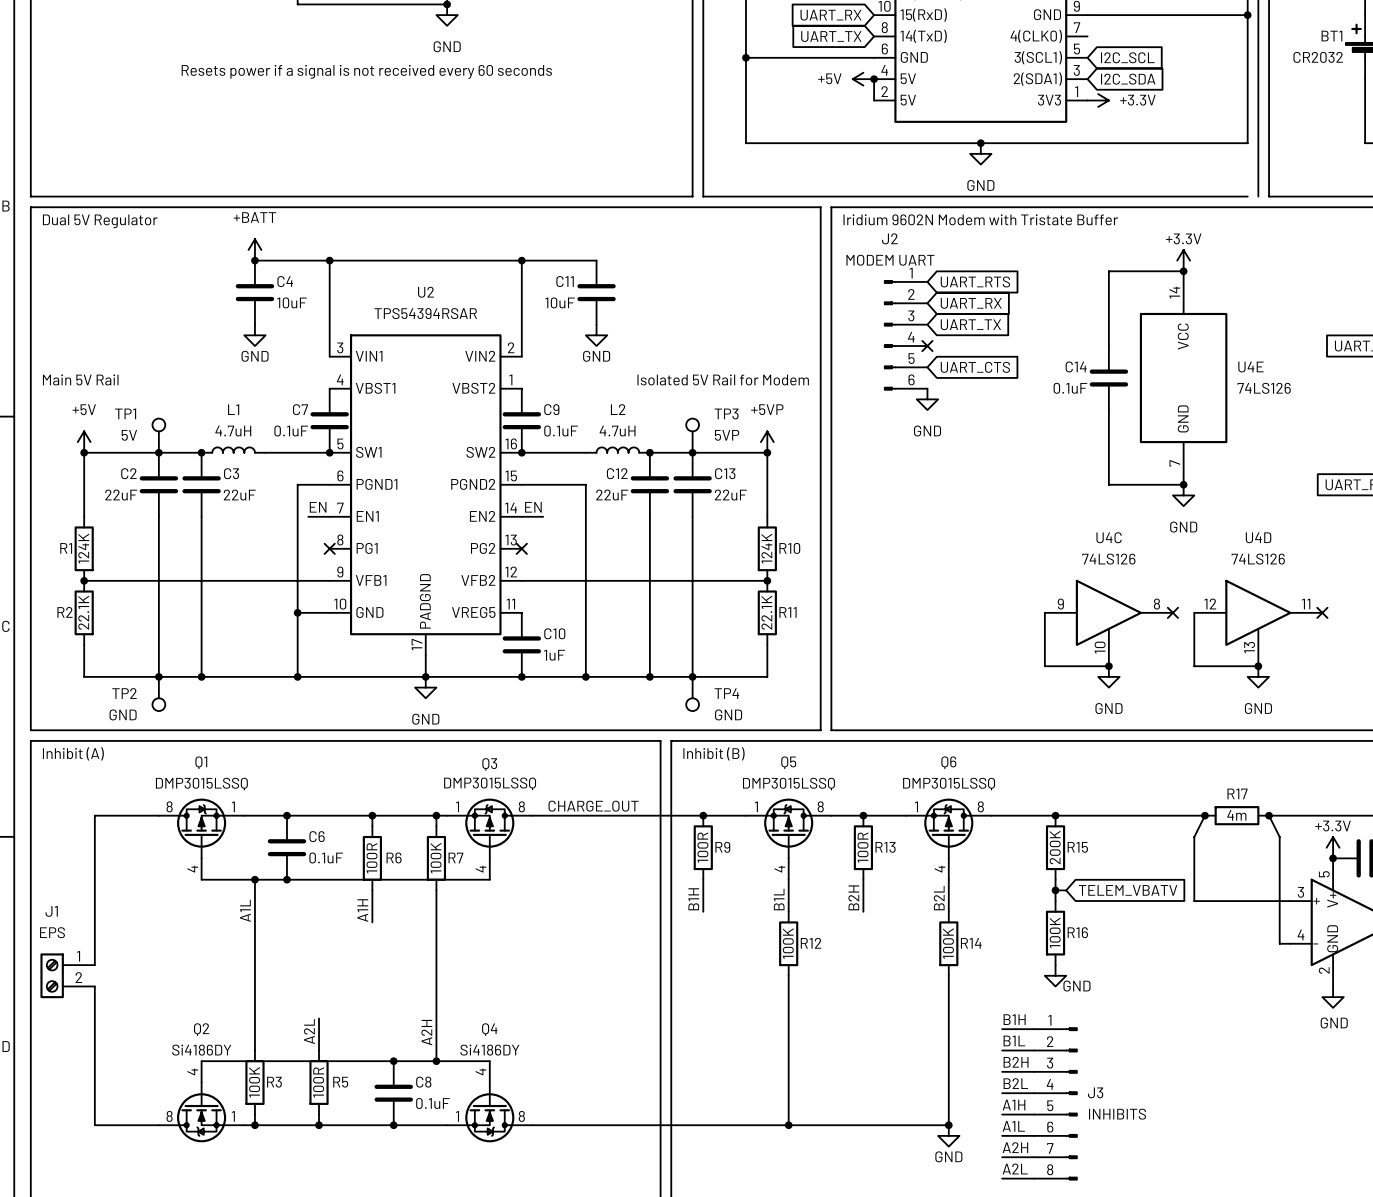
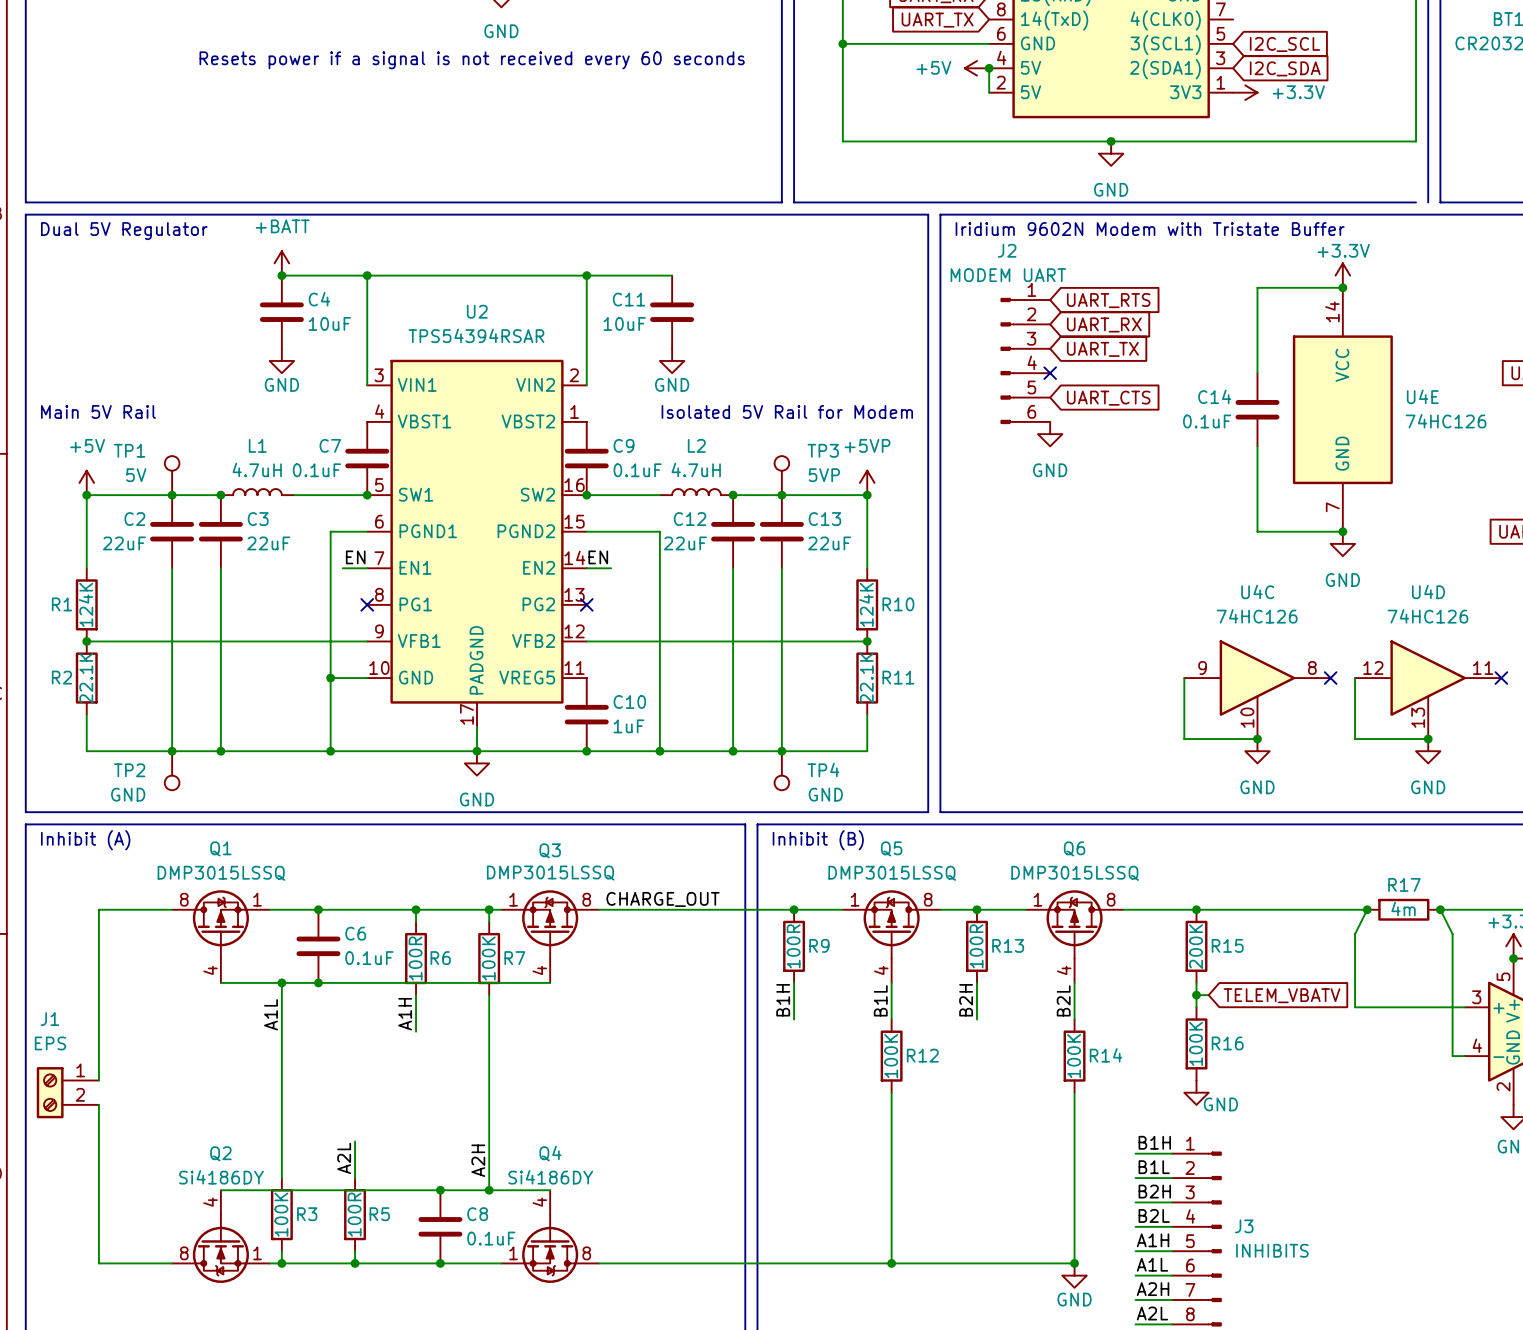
U4E value: 74LS126 (1264, 388) -> 74HC126 (1446, 421)
U4C value: 74LS126 (1108, 559) -> 74HC126 (1257, 616)
U4D value: 74LS126 (1258, 559) -> 74HC126 (1427, 616)

